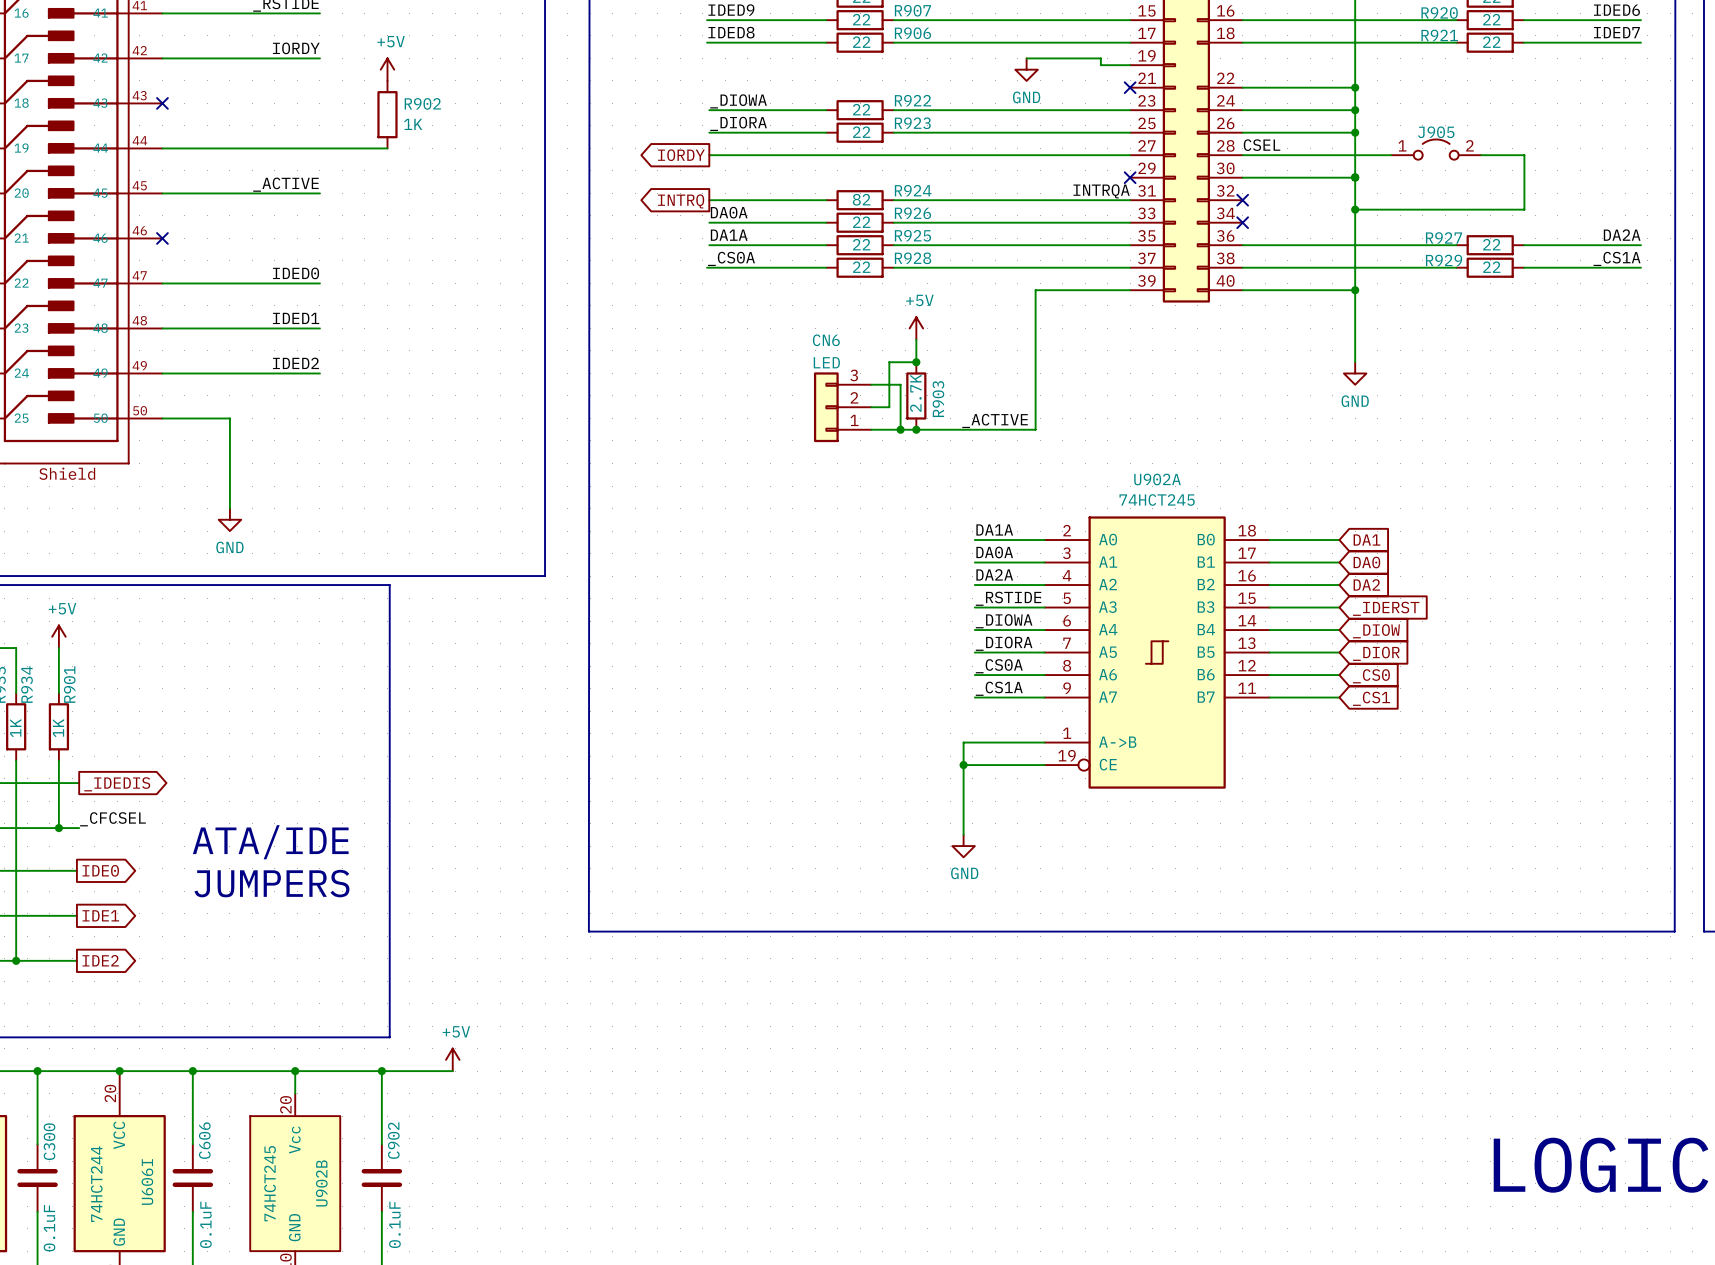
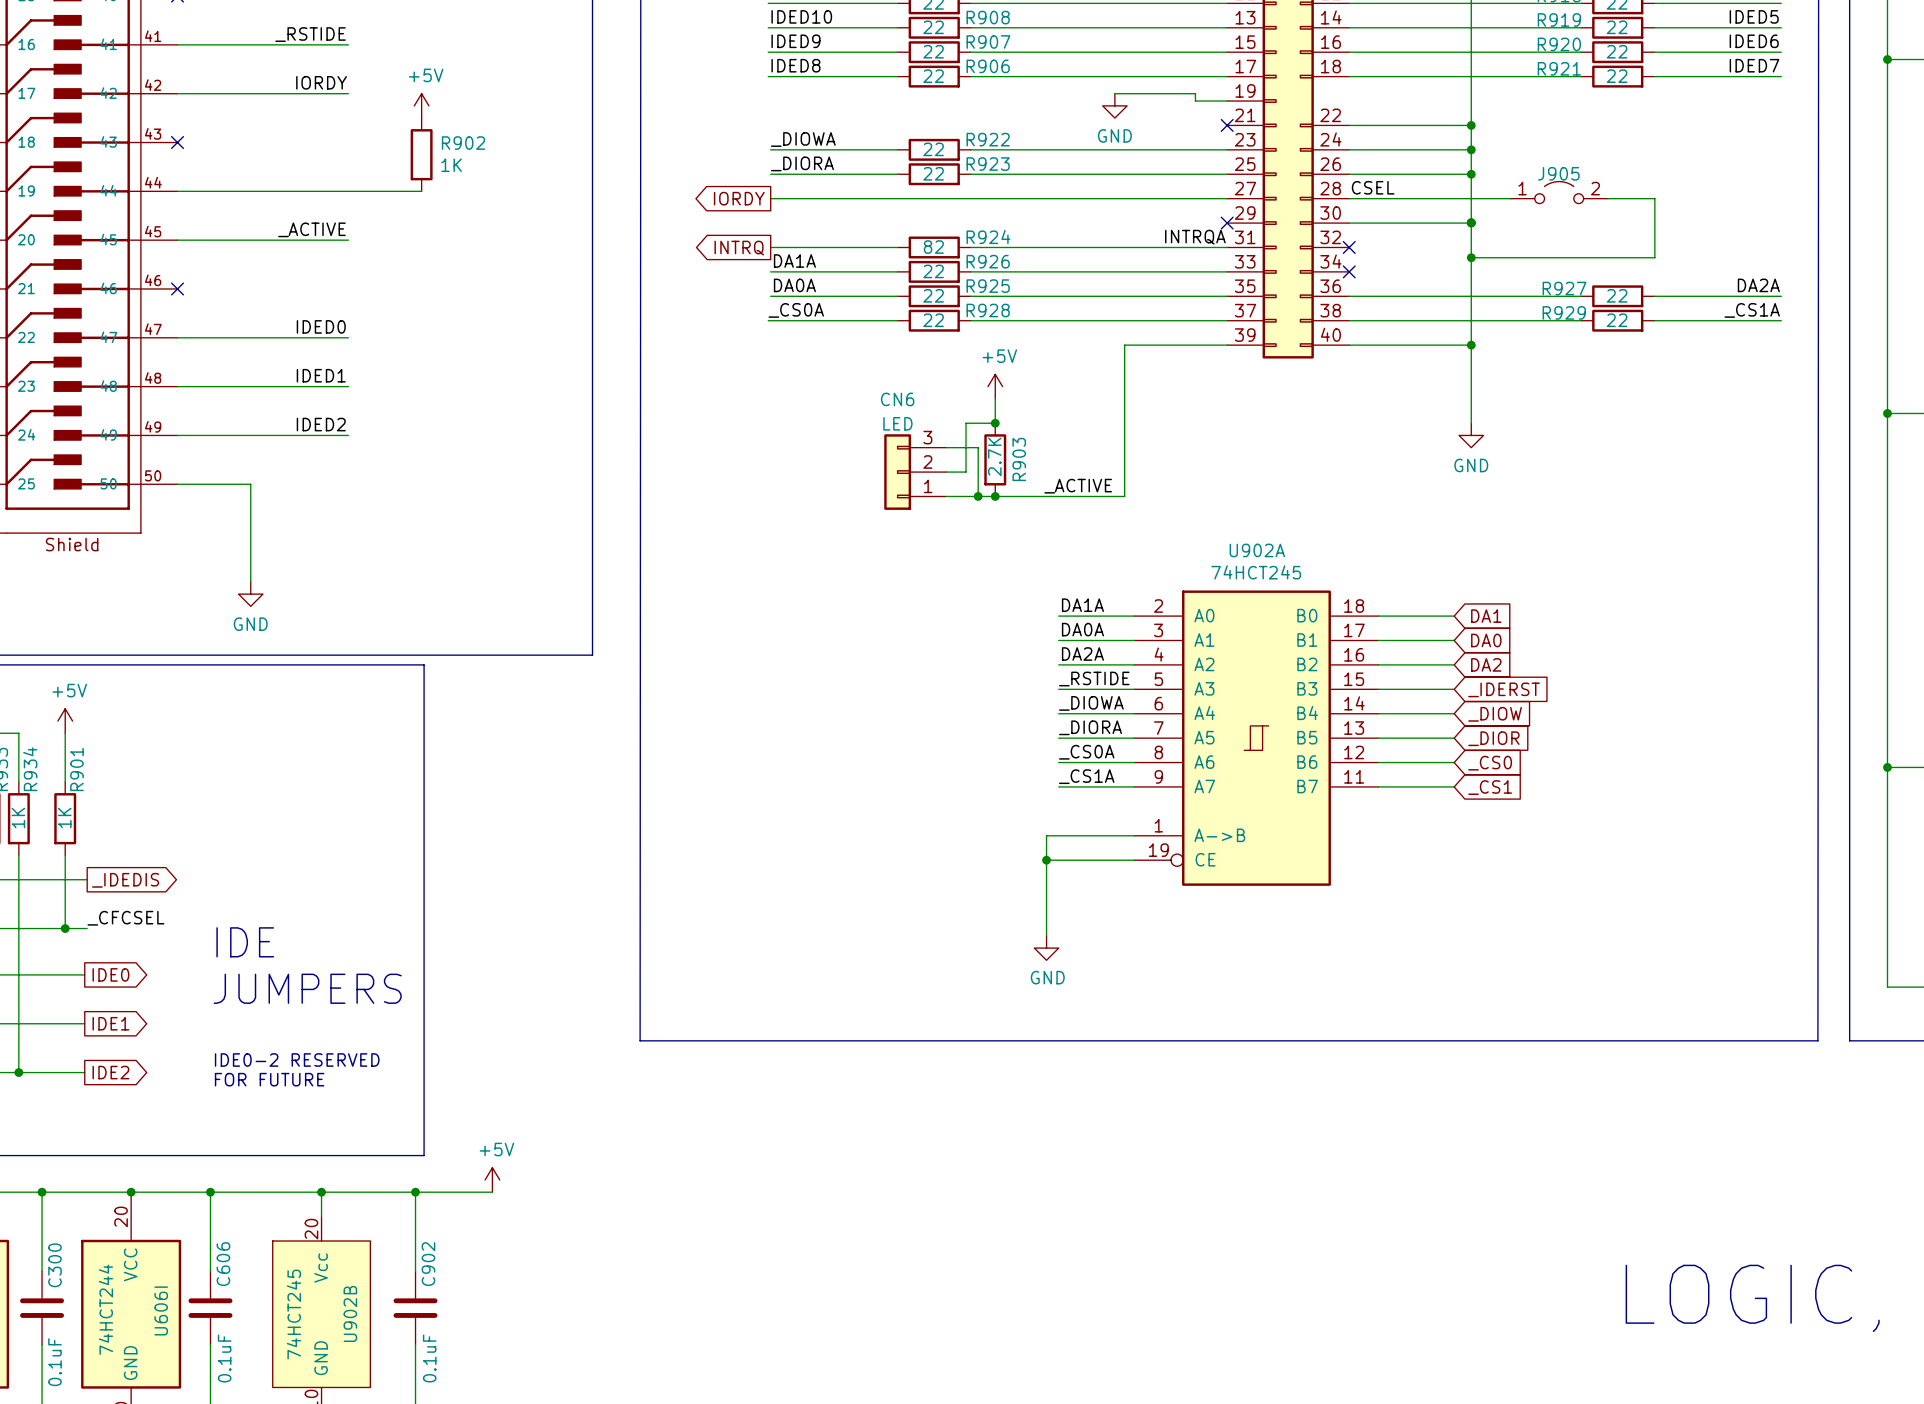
label: DA0A (729, 212) -> DA1A (794, 261)
label: DA1A (729, 235) -> DA0A (794, 285)
text: ATA/IDE (270, 842) -> IDE (245, 942)
text: none -> IDE0-2 RESERVED (297, 1060)
text: none -> FOR FUTURE (269, 1079)

